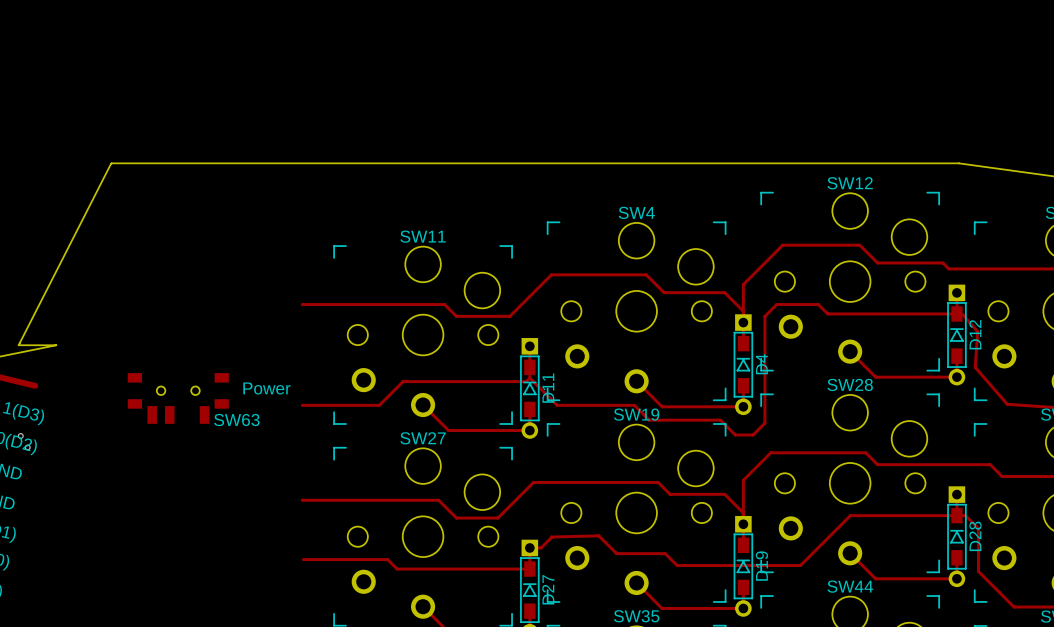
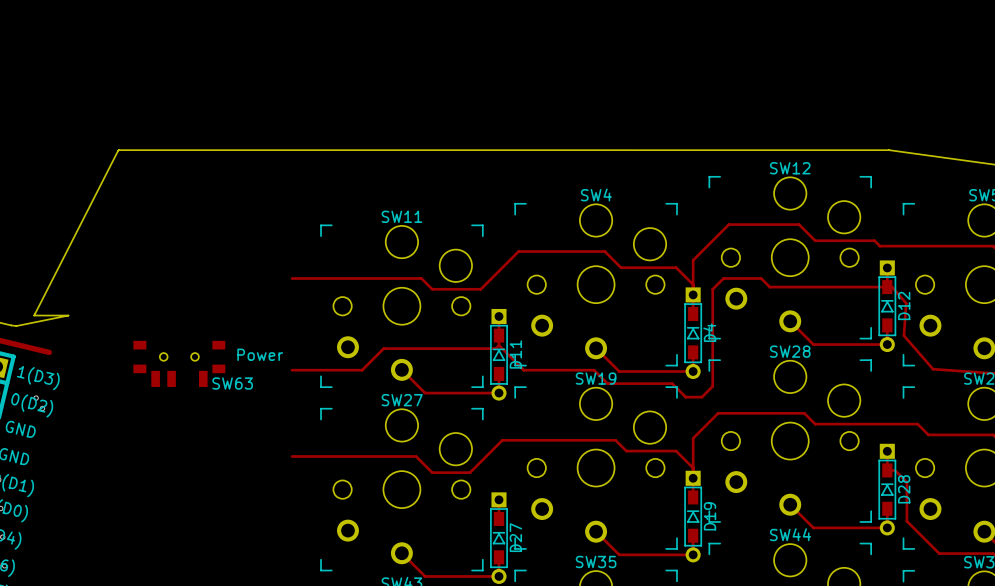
track: (956, 515) (850, 515) (800, 565) (677, 565) (665, 553) (616, 553) (598, 535) (551, 537) (541, 547) (529, 547) -> none
track: (303, 559) (387, 559) (397, 569) (529, 569) -> none

